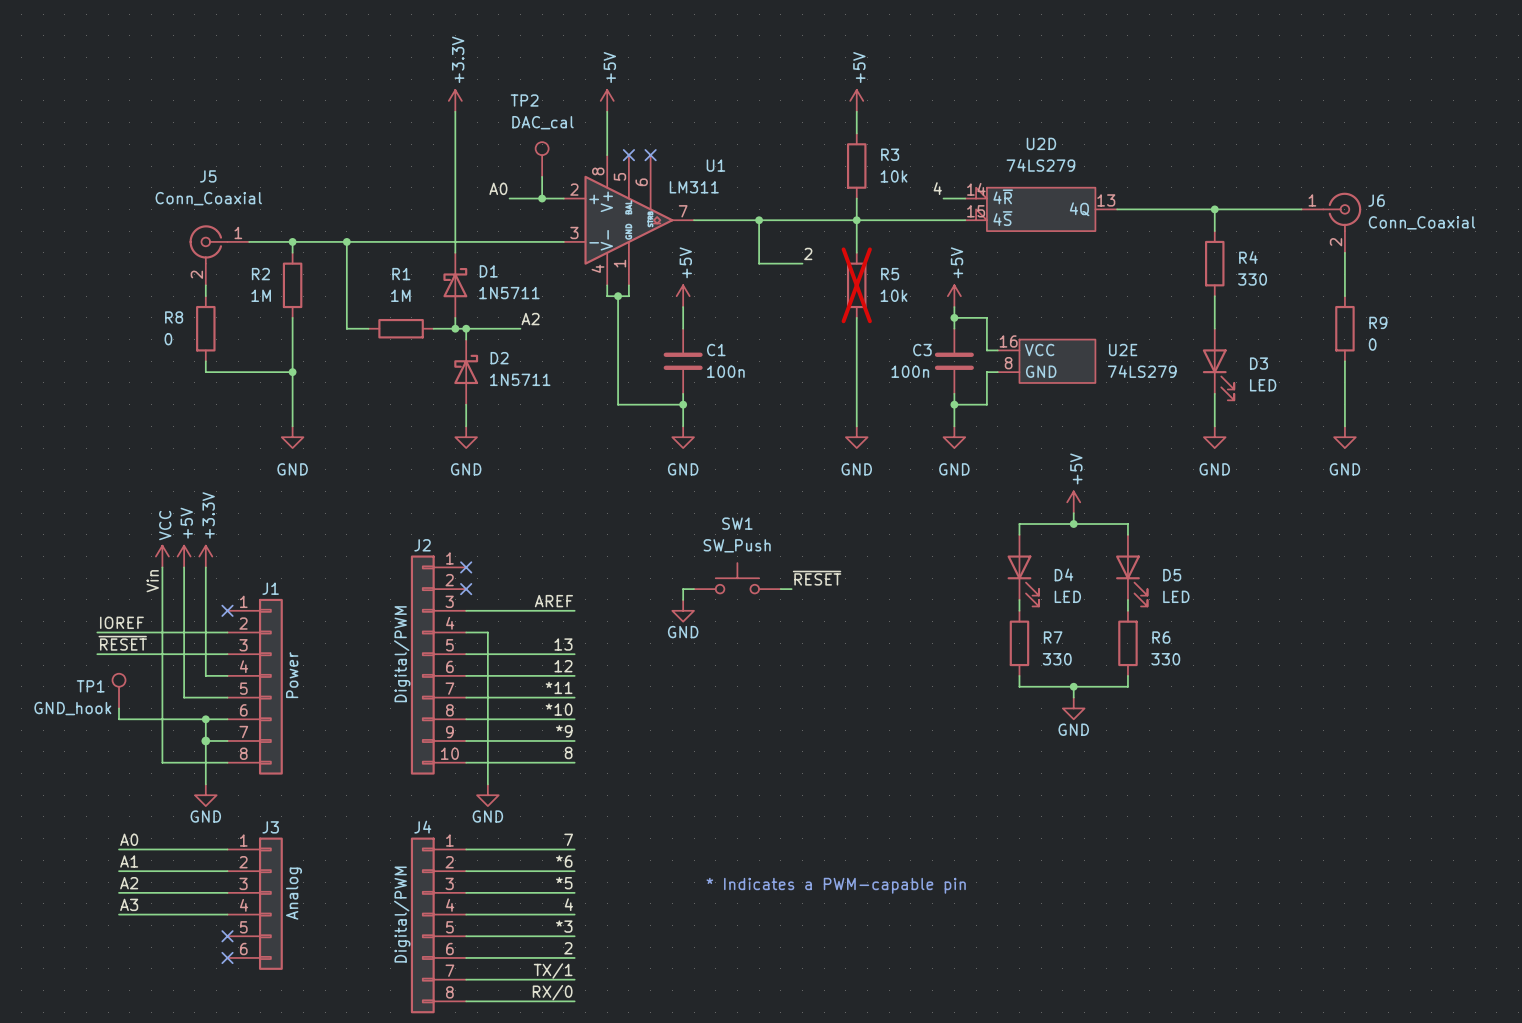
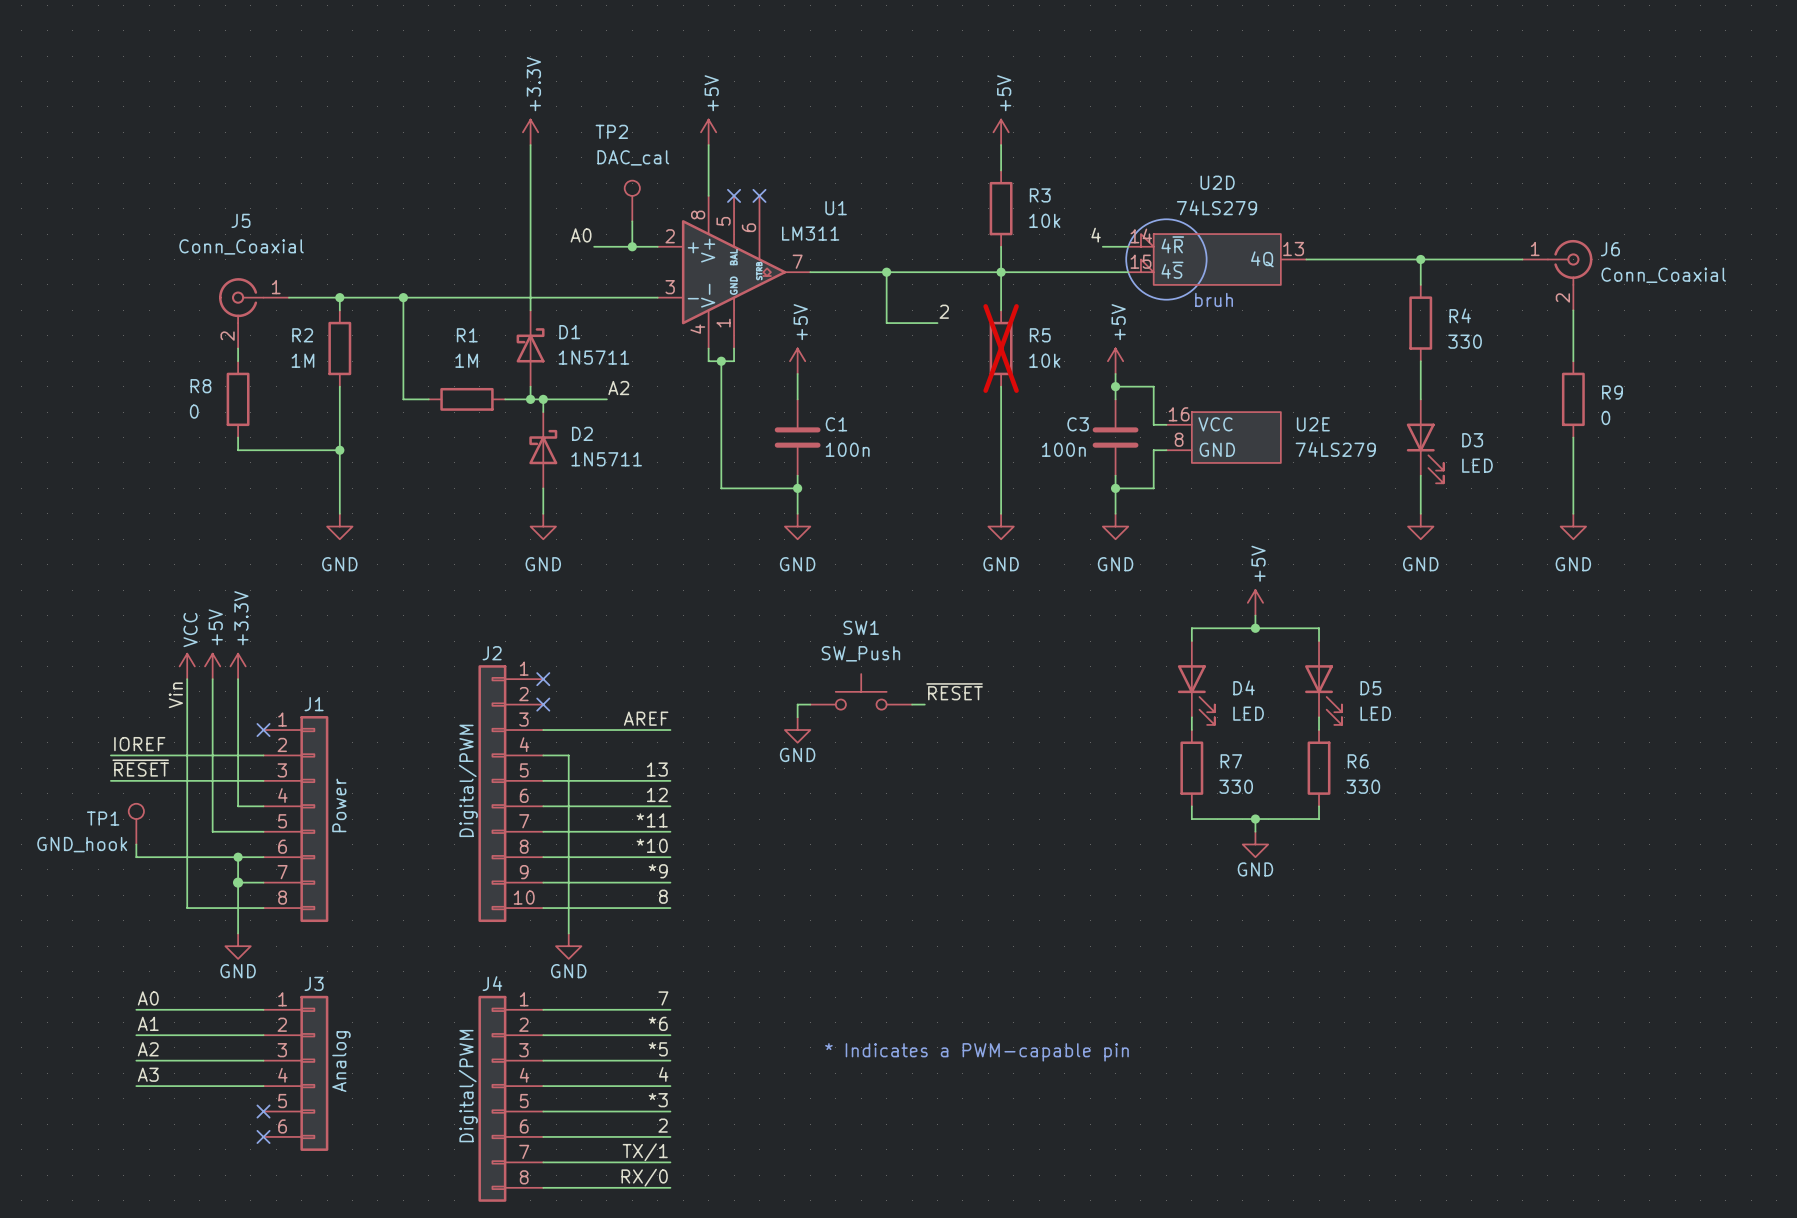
drawing: none -> [1126, 219, 1207, 300]
text: none -> bruh (1214, 299)

